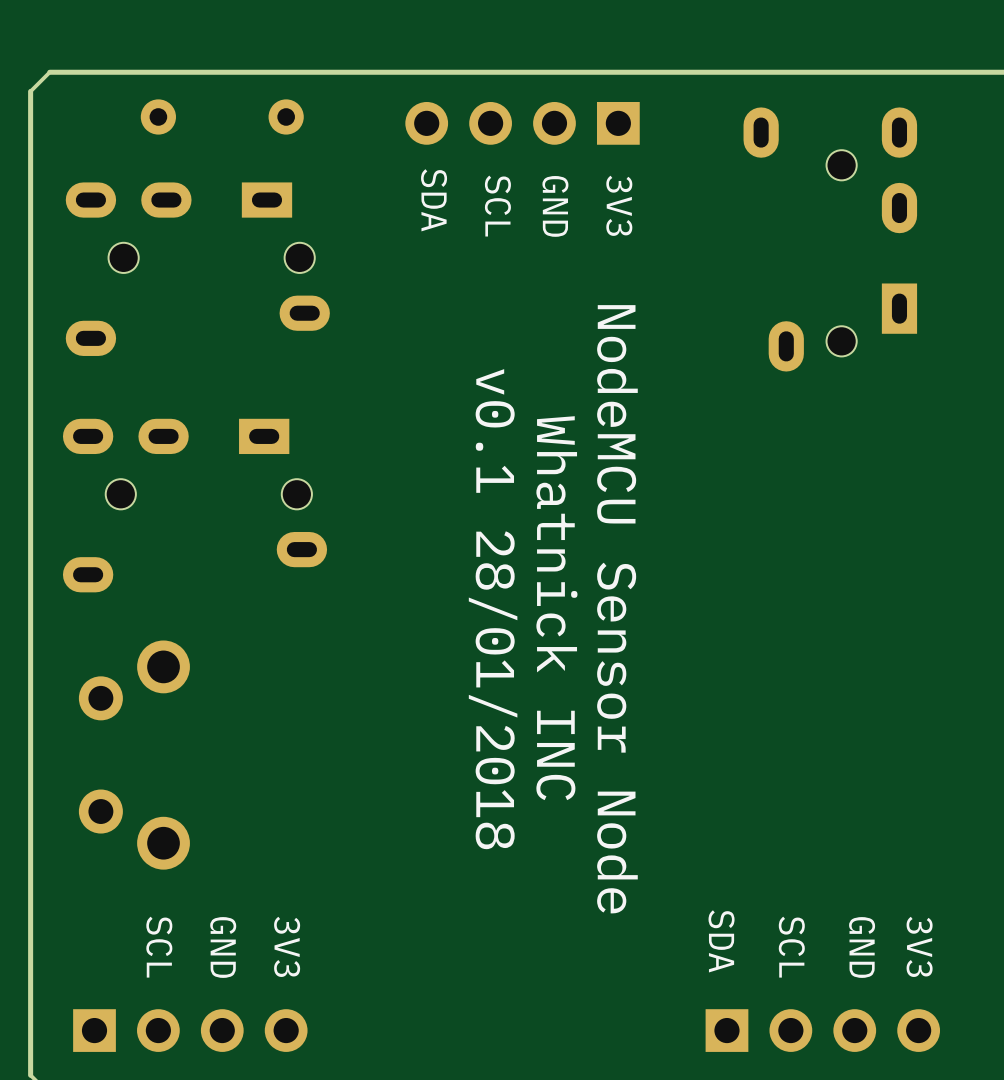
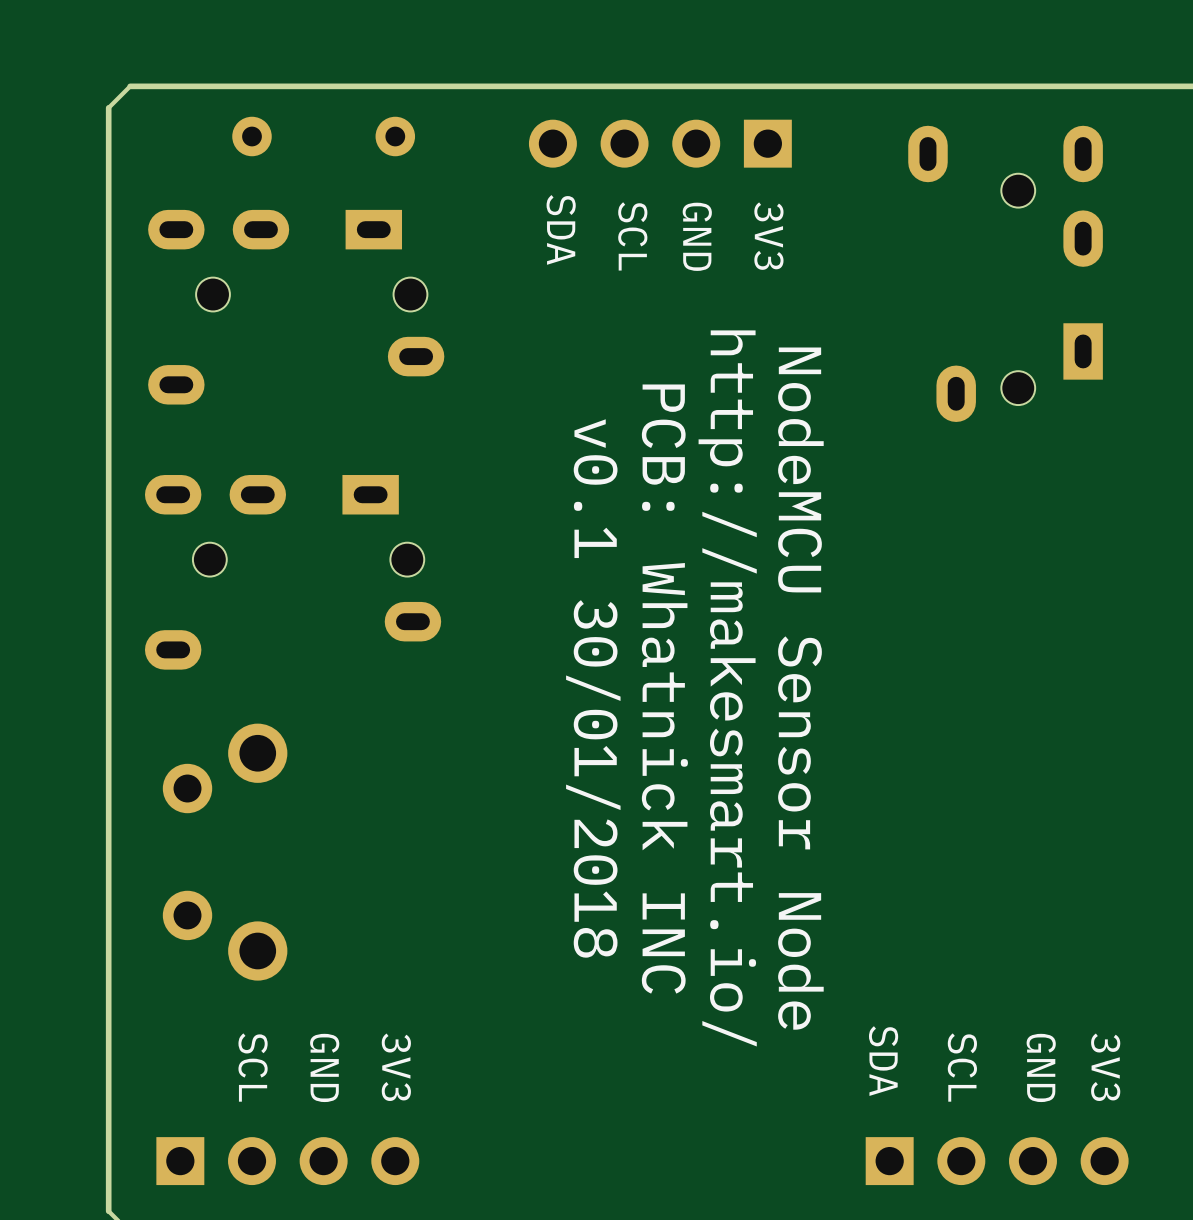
text: Whatnick INC (556, 608) -> PCB: Whatnick INC (664, 689)
text: v0.1 28/01/2018 (493, 609) -> v0.1 30/01/2018 (593, 688)
text: none -> http://makesmart.io/ (727, 688)
text position: NodeMCU Sensor Node (617, 609) -> NodeMCU Sensor Node (800, 688)

